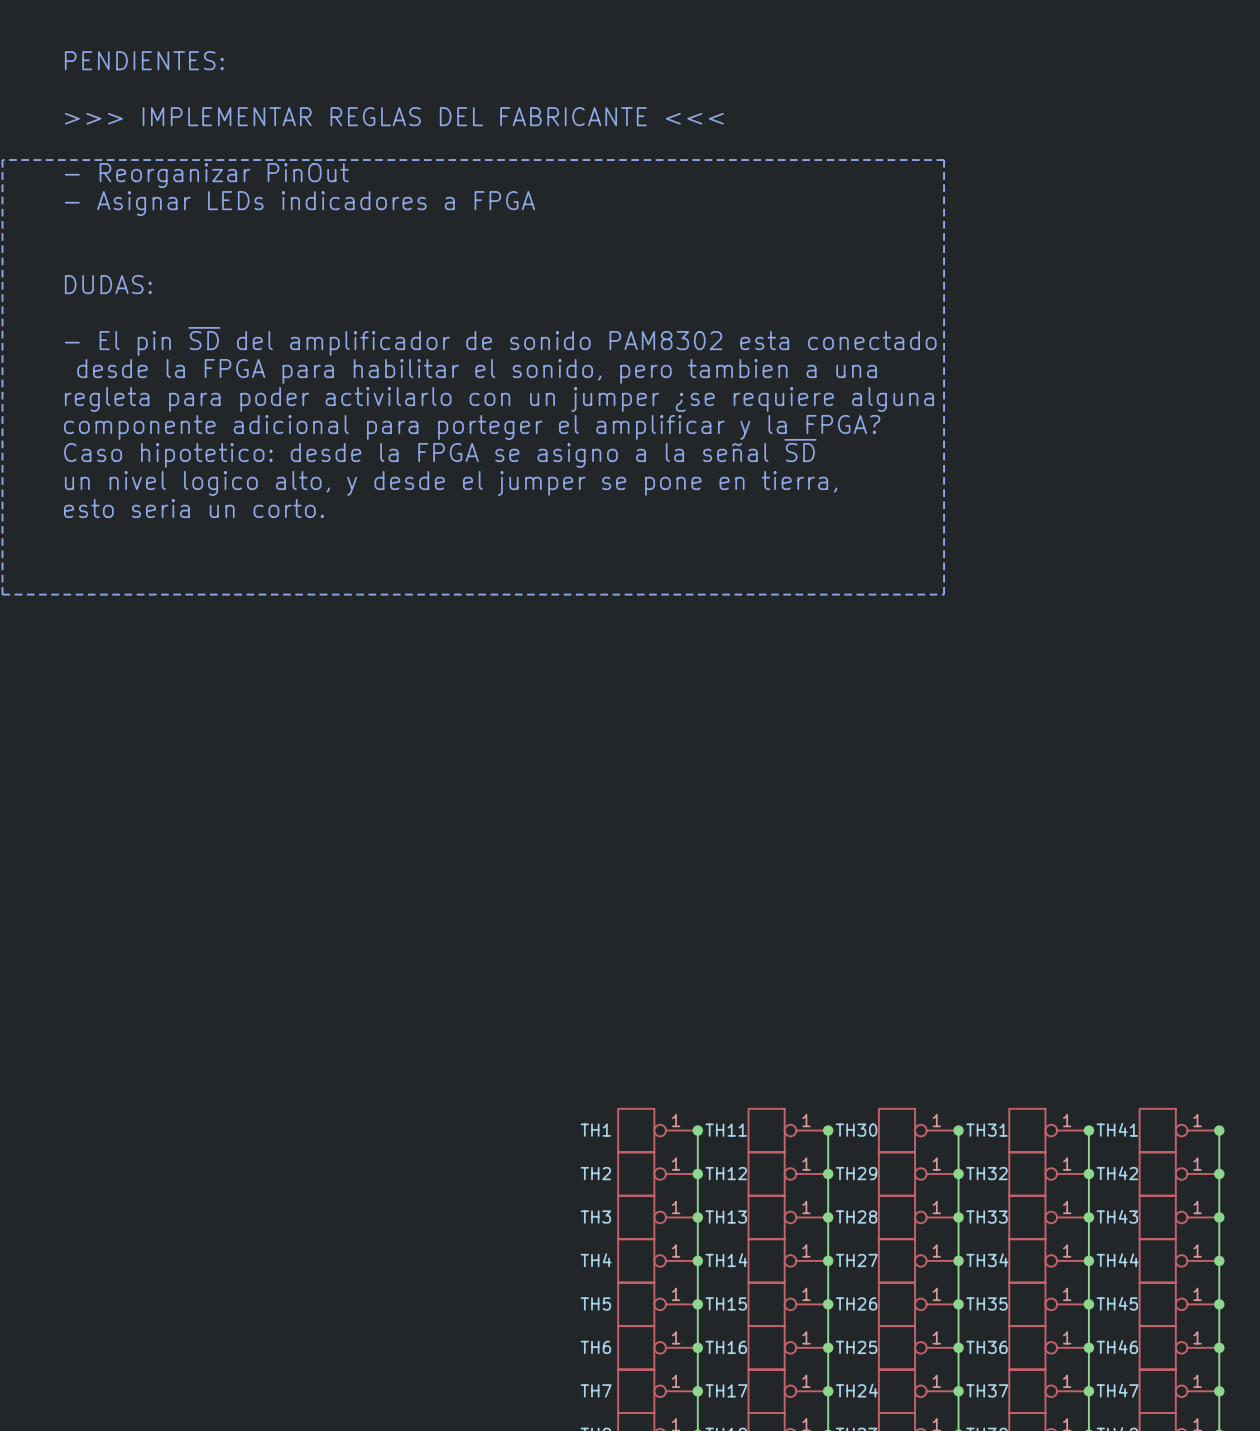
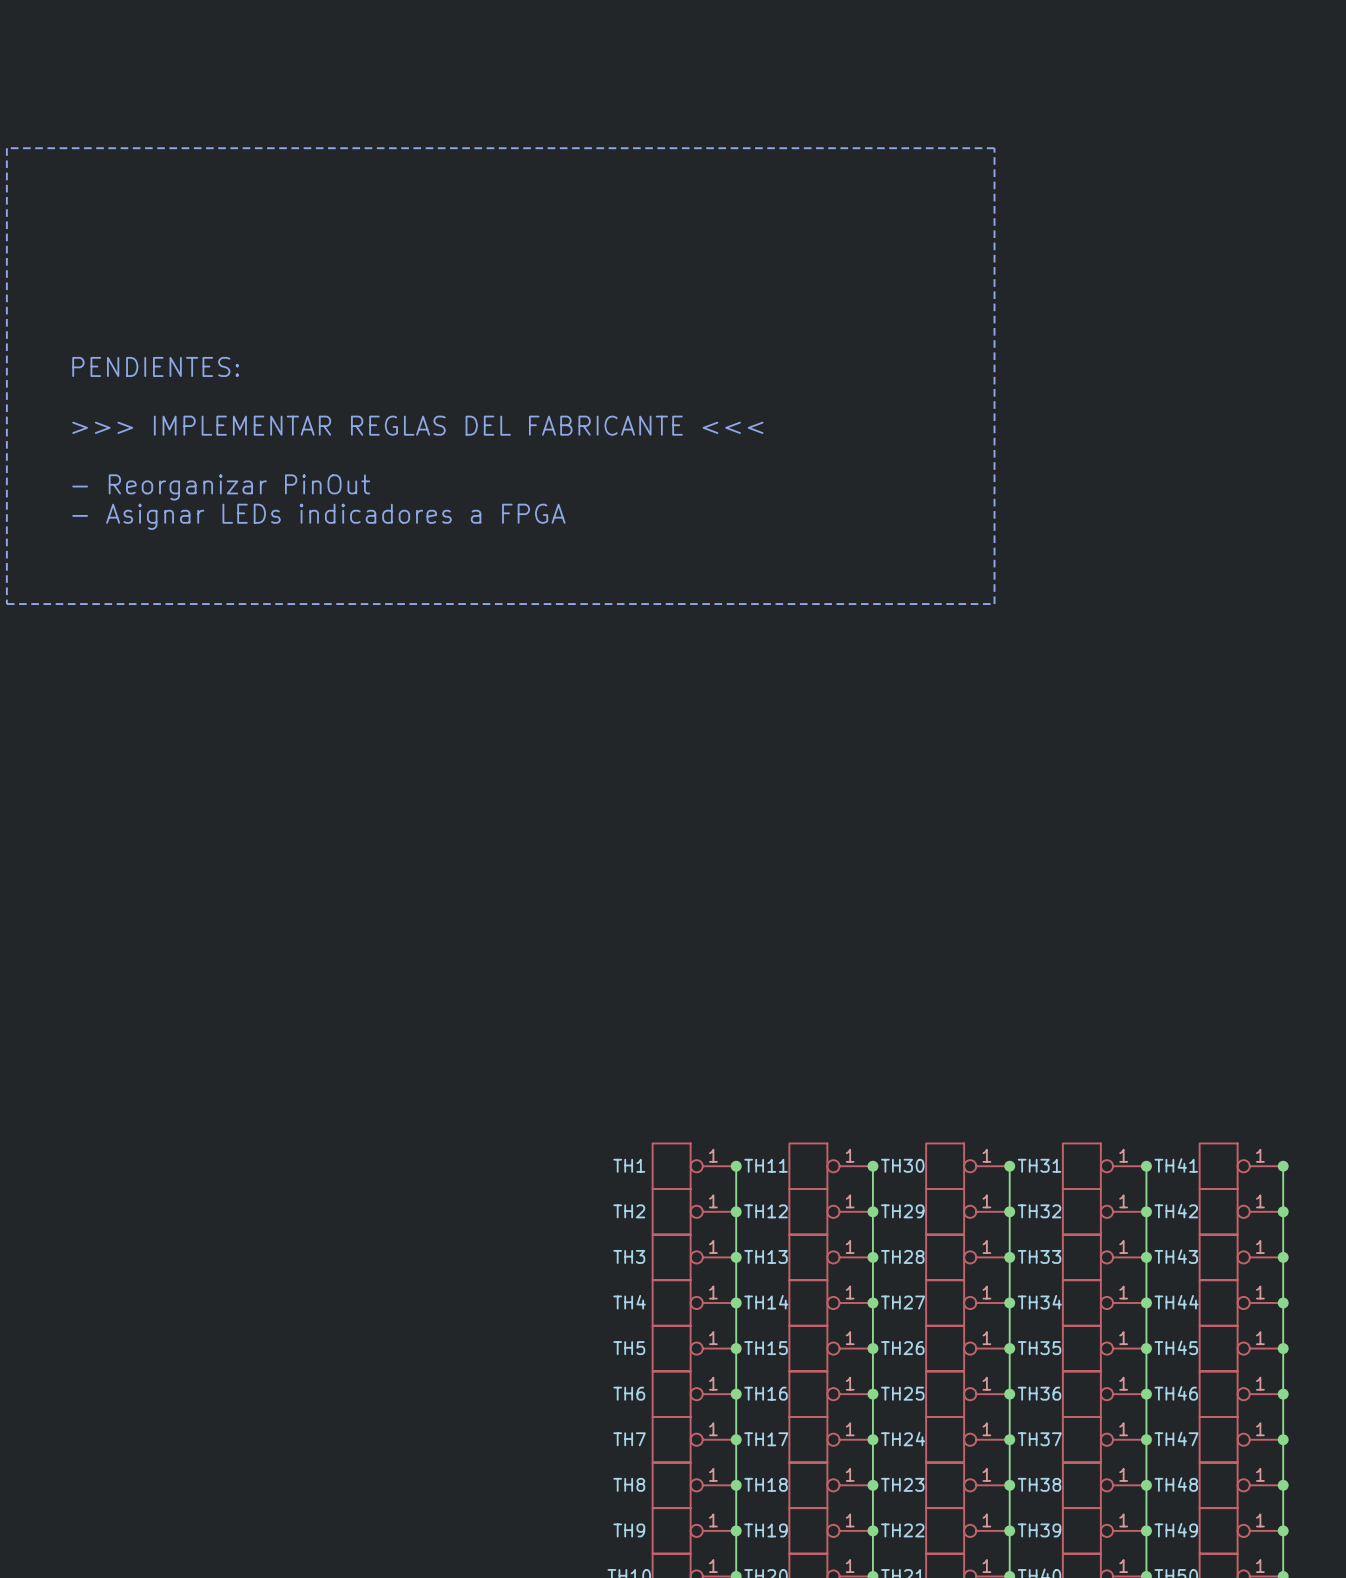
text: PENDIENTES: (144, 60) -> none
text: >>> IMPLEMENTAR REGLAS DEL FABRICANTE <<< (394, 116) -> none
text: - Reorganizar PinOut (206, 175) -> none
text: - Asignar LEDs indicadores a FPGA (299, 203) -> none
text: DUDAS: (108, 284) -> none
text: - El pin ~{SD} del amplificador de sonido PAM8302 esta conectado (500, 341) -> none
text: desde la FPGA para habilitar el sonido, pero tambien a una (477, 371) -> PENDIENTES: (155, 366)
text: regleta para poder activilarlo con un jumper ¿se requiere alguna (499, 399) -> none
text: componente adicional para porteger el amplificar y la FPGA? (472, 427) -> >>> IMPLEMENTAR REGLAS DEL FABRICANTE <<< (417, 425)
text: Caso hipotetico: desde la FPGA se asigno a la señal ~{SD} (440, 453) -> none
text: un nivel logico alto, y desde el jumper se pone en tierra, (451, 483) -> - Reorganizar PinOut (221, 487)
text: esto seria un corto. (194, 508) -> - Asignar LEDs indicadores a FPGA (318, 516)

